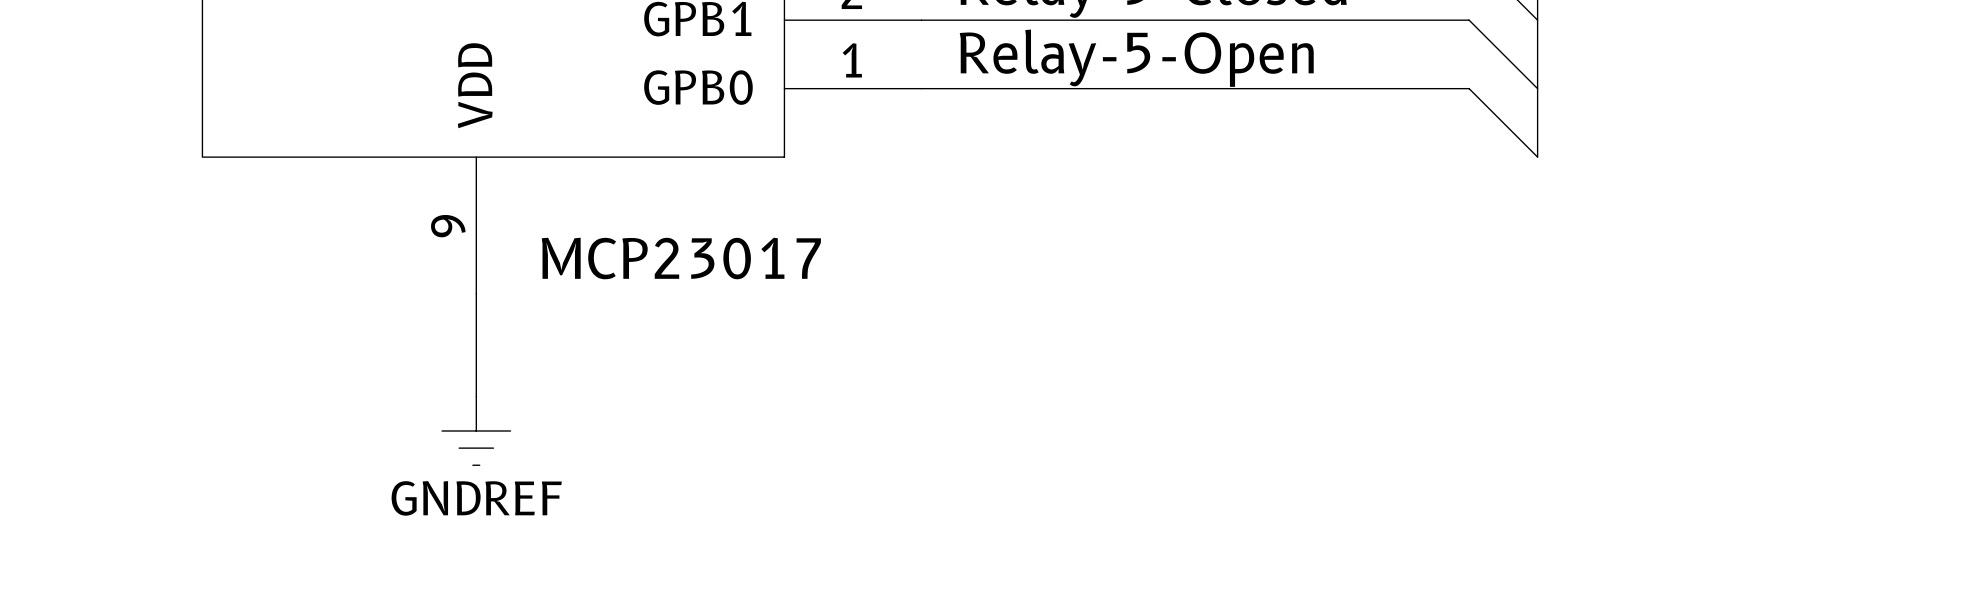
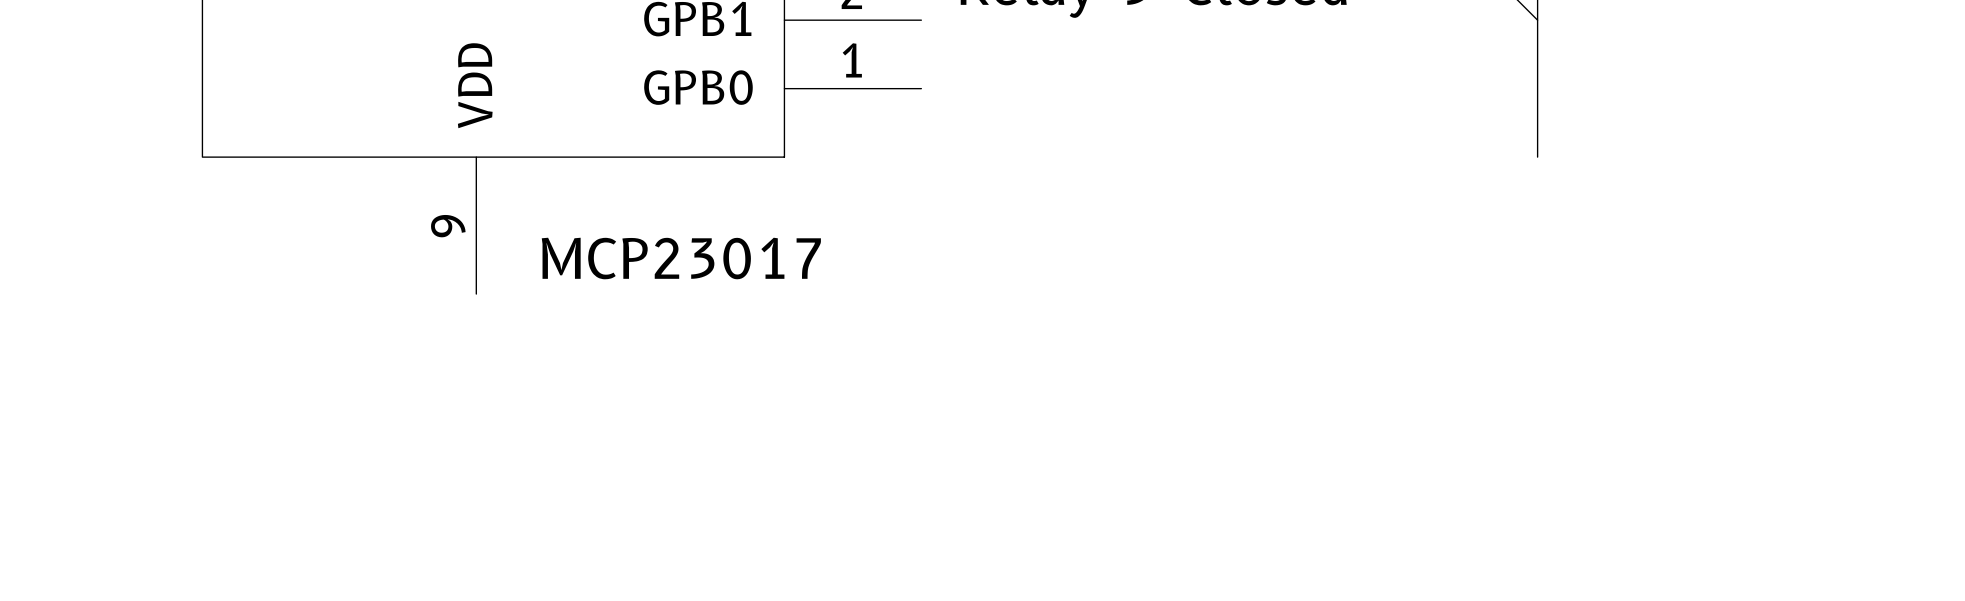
wire: (921, 20) (1469, 20) (1537, 88) -> none
label: Relay-5-Open (1136, 58) -> none
wire: (921, 88) (1469, 88) (1537, 157) -> none
wire: (476, 294) (476, 396) -> none
power symbol: GNDREF (476, 431) -> none

